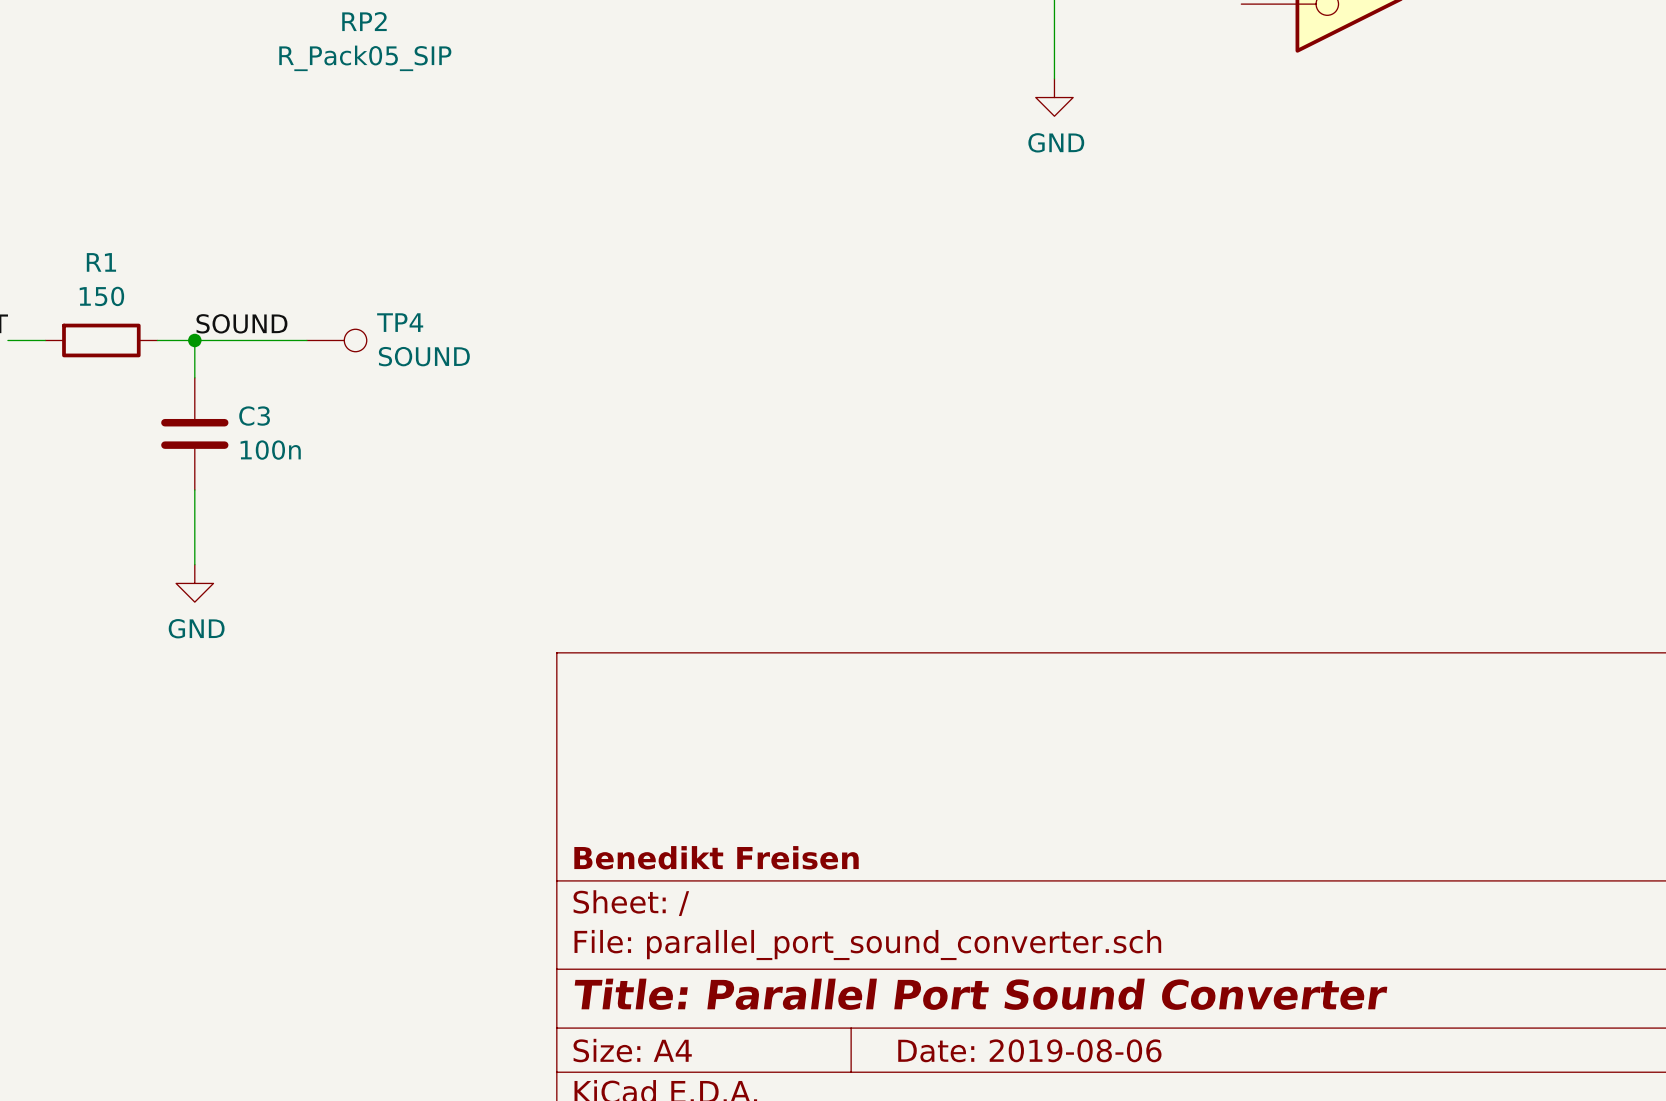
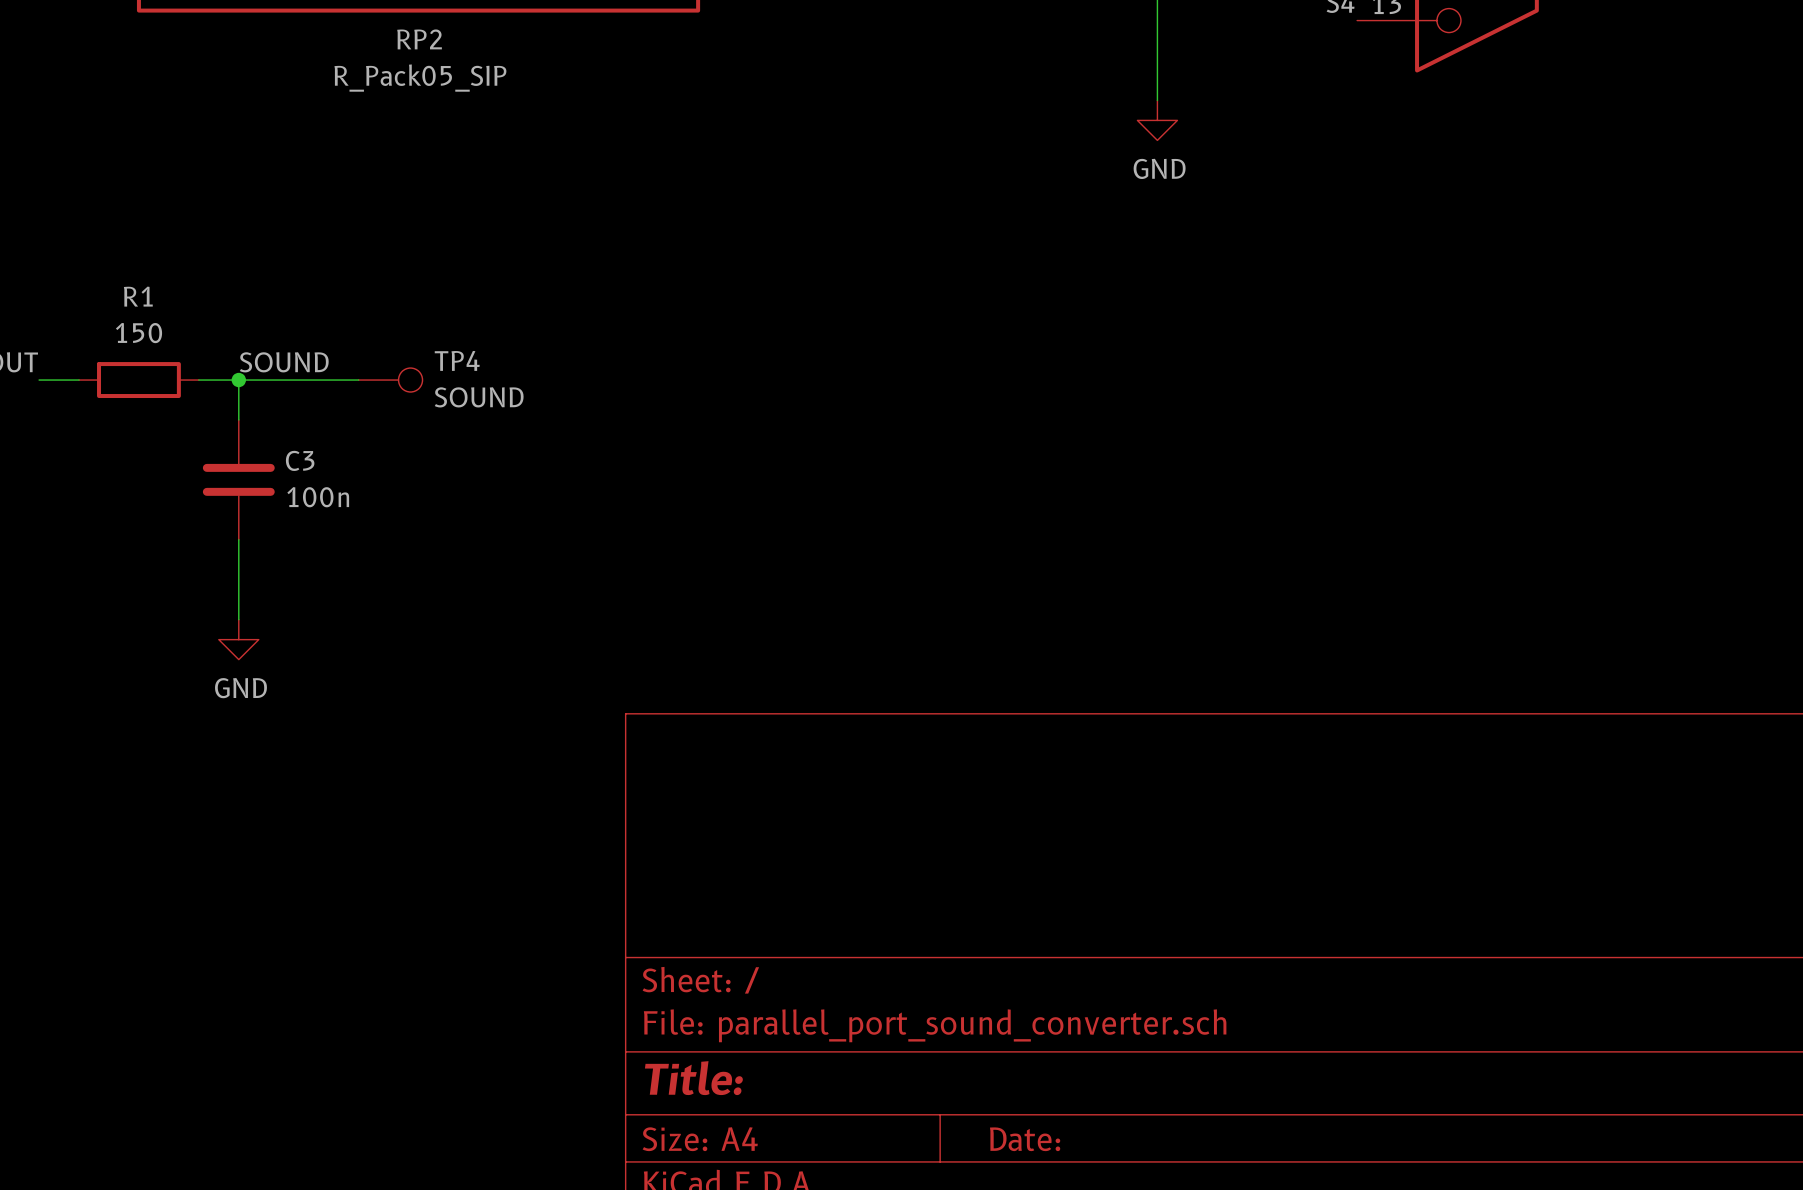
title block: Benedikt Freisen (716, 857) -> none
title block: Title: Parallel Port Sound Converter (980, 994) -> Title: (693, 1078)
title block: Date: 2019-08-06 (1029, 1050) -> Date: (1025, 1139)

